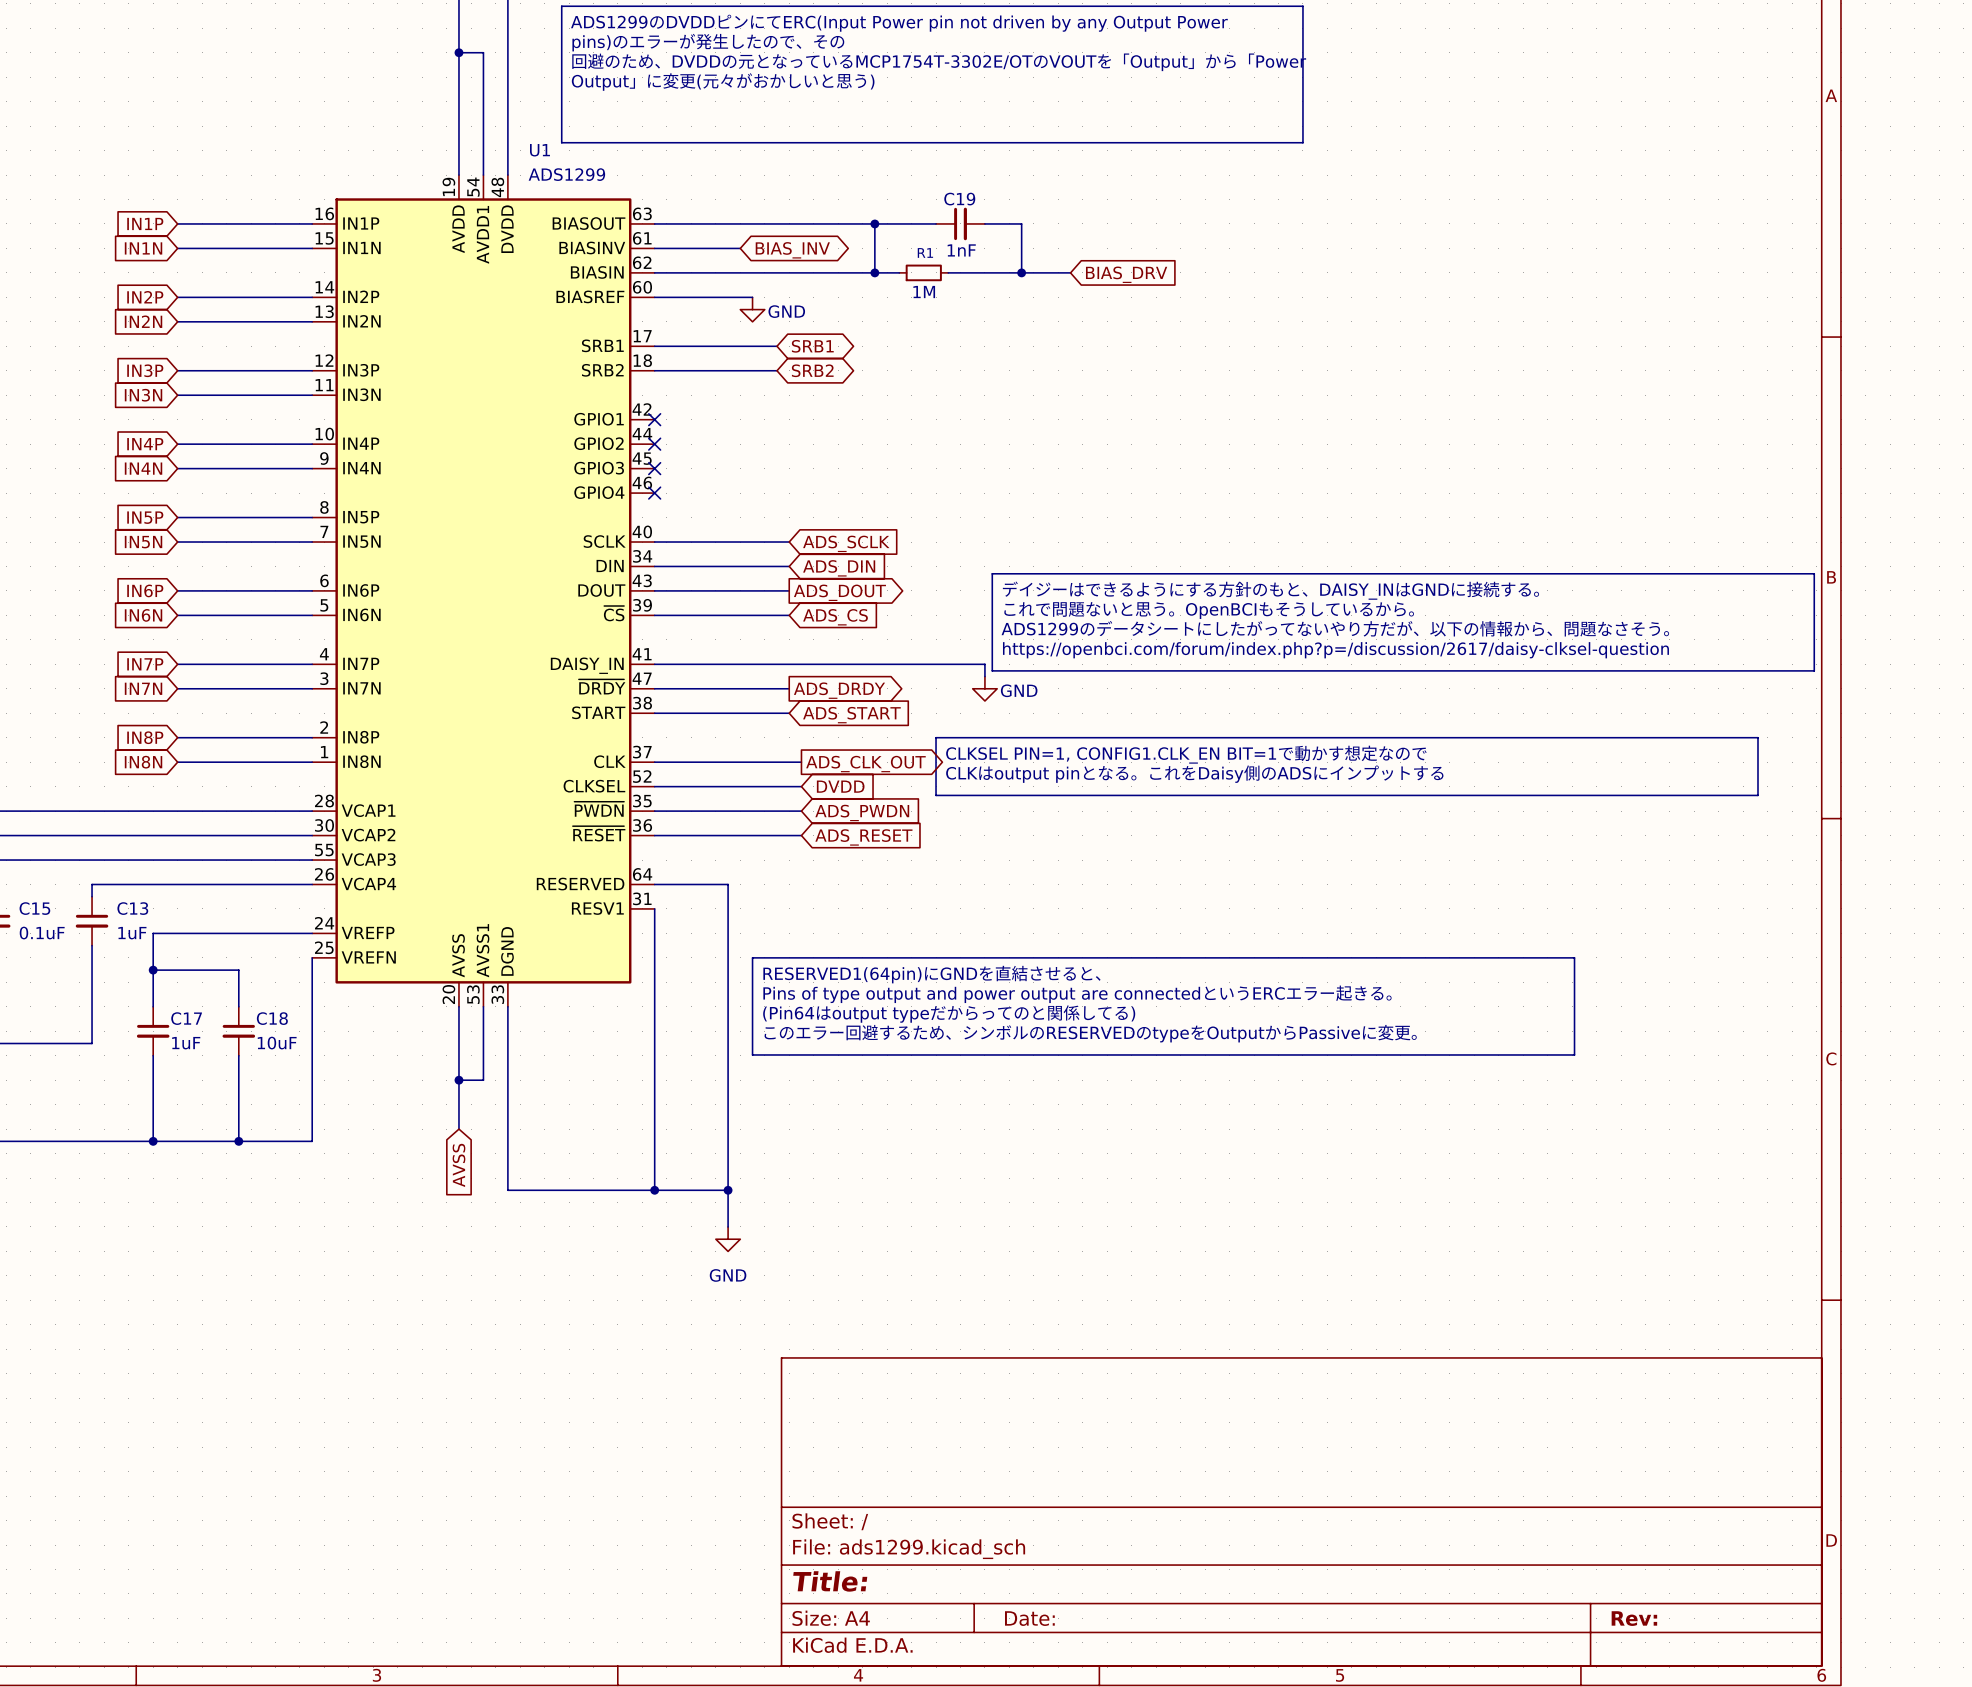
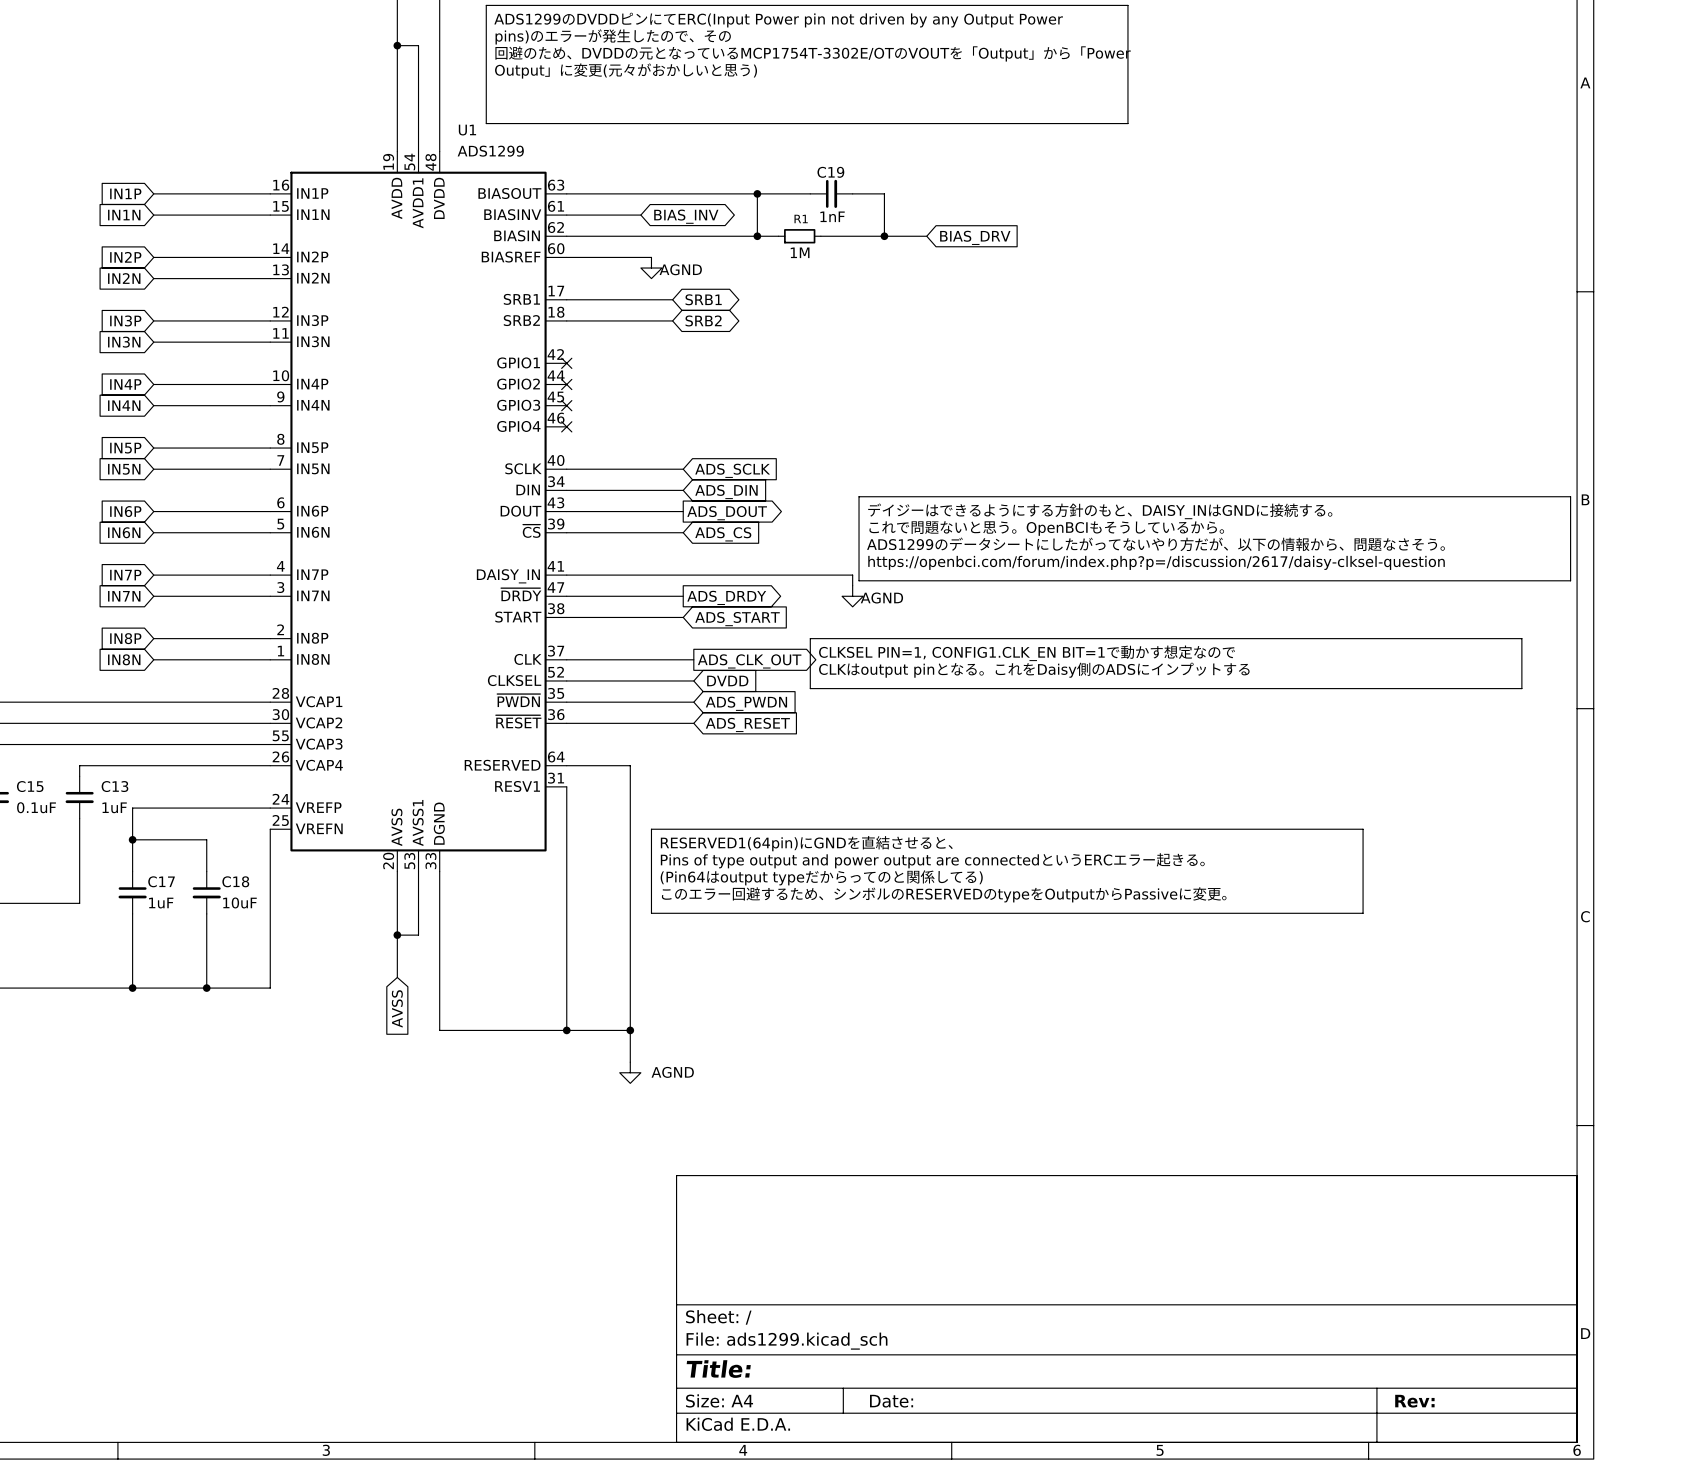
power symbol: GND (752, 309) -> AGND (651, 268)
power symbol: GND (984, 688) -> AGND (852, 596)
power symbol: GND (728, 1239) -> AGND (630, 1072)

